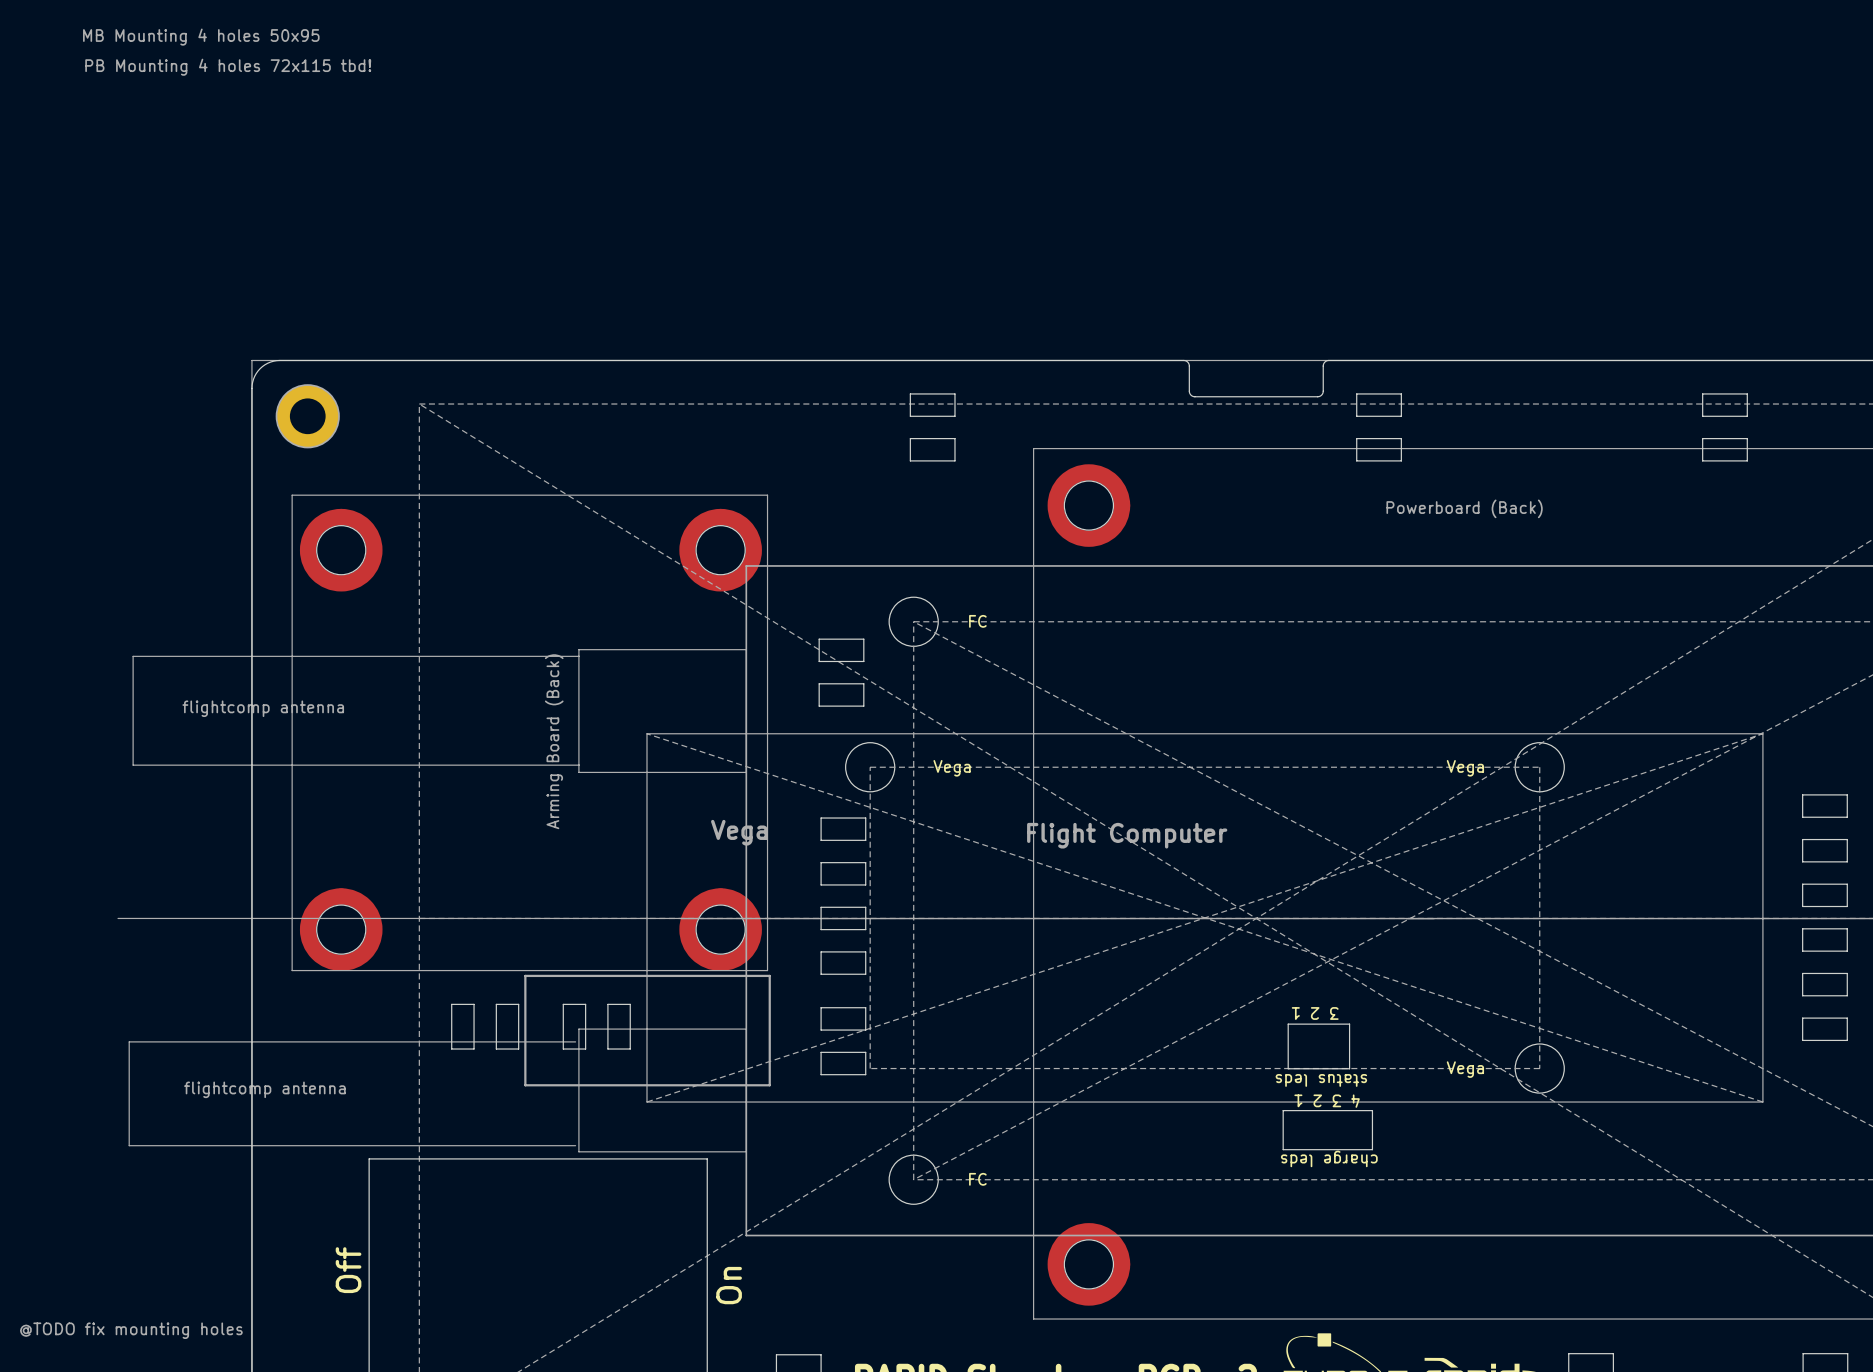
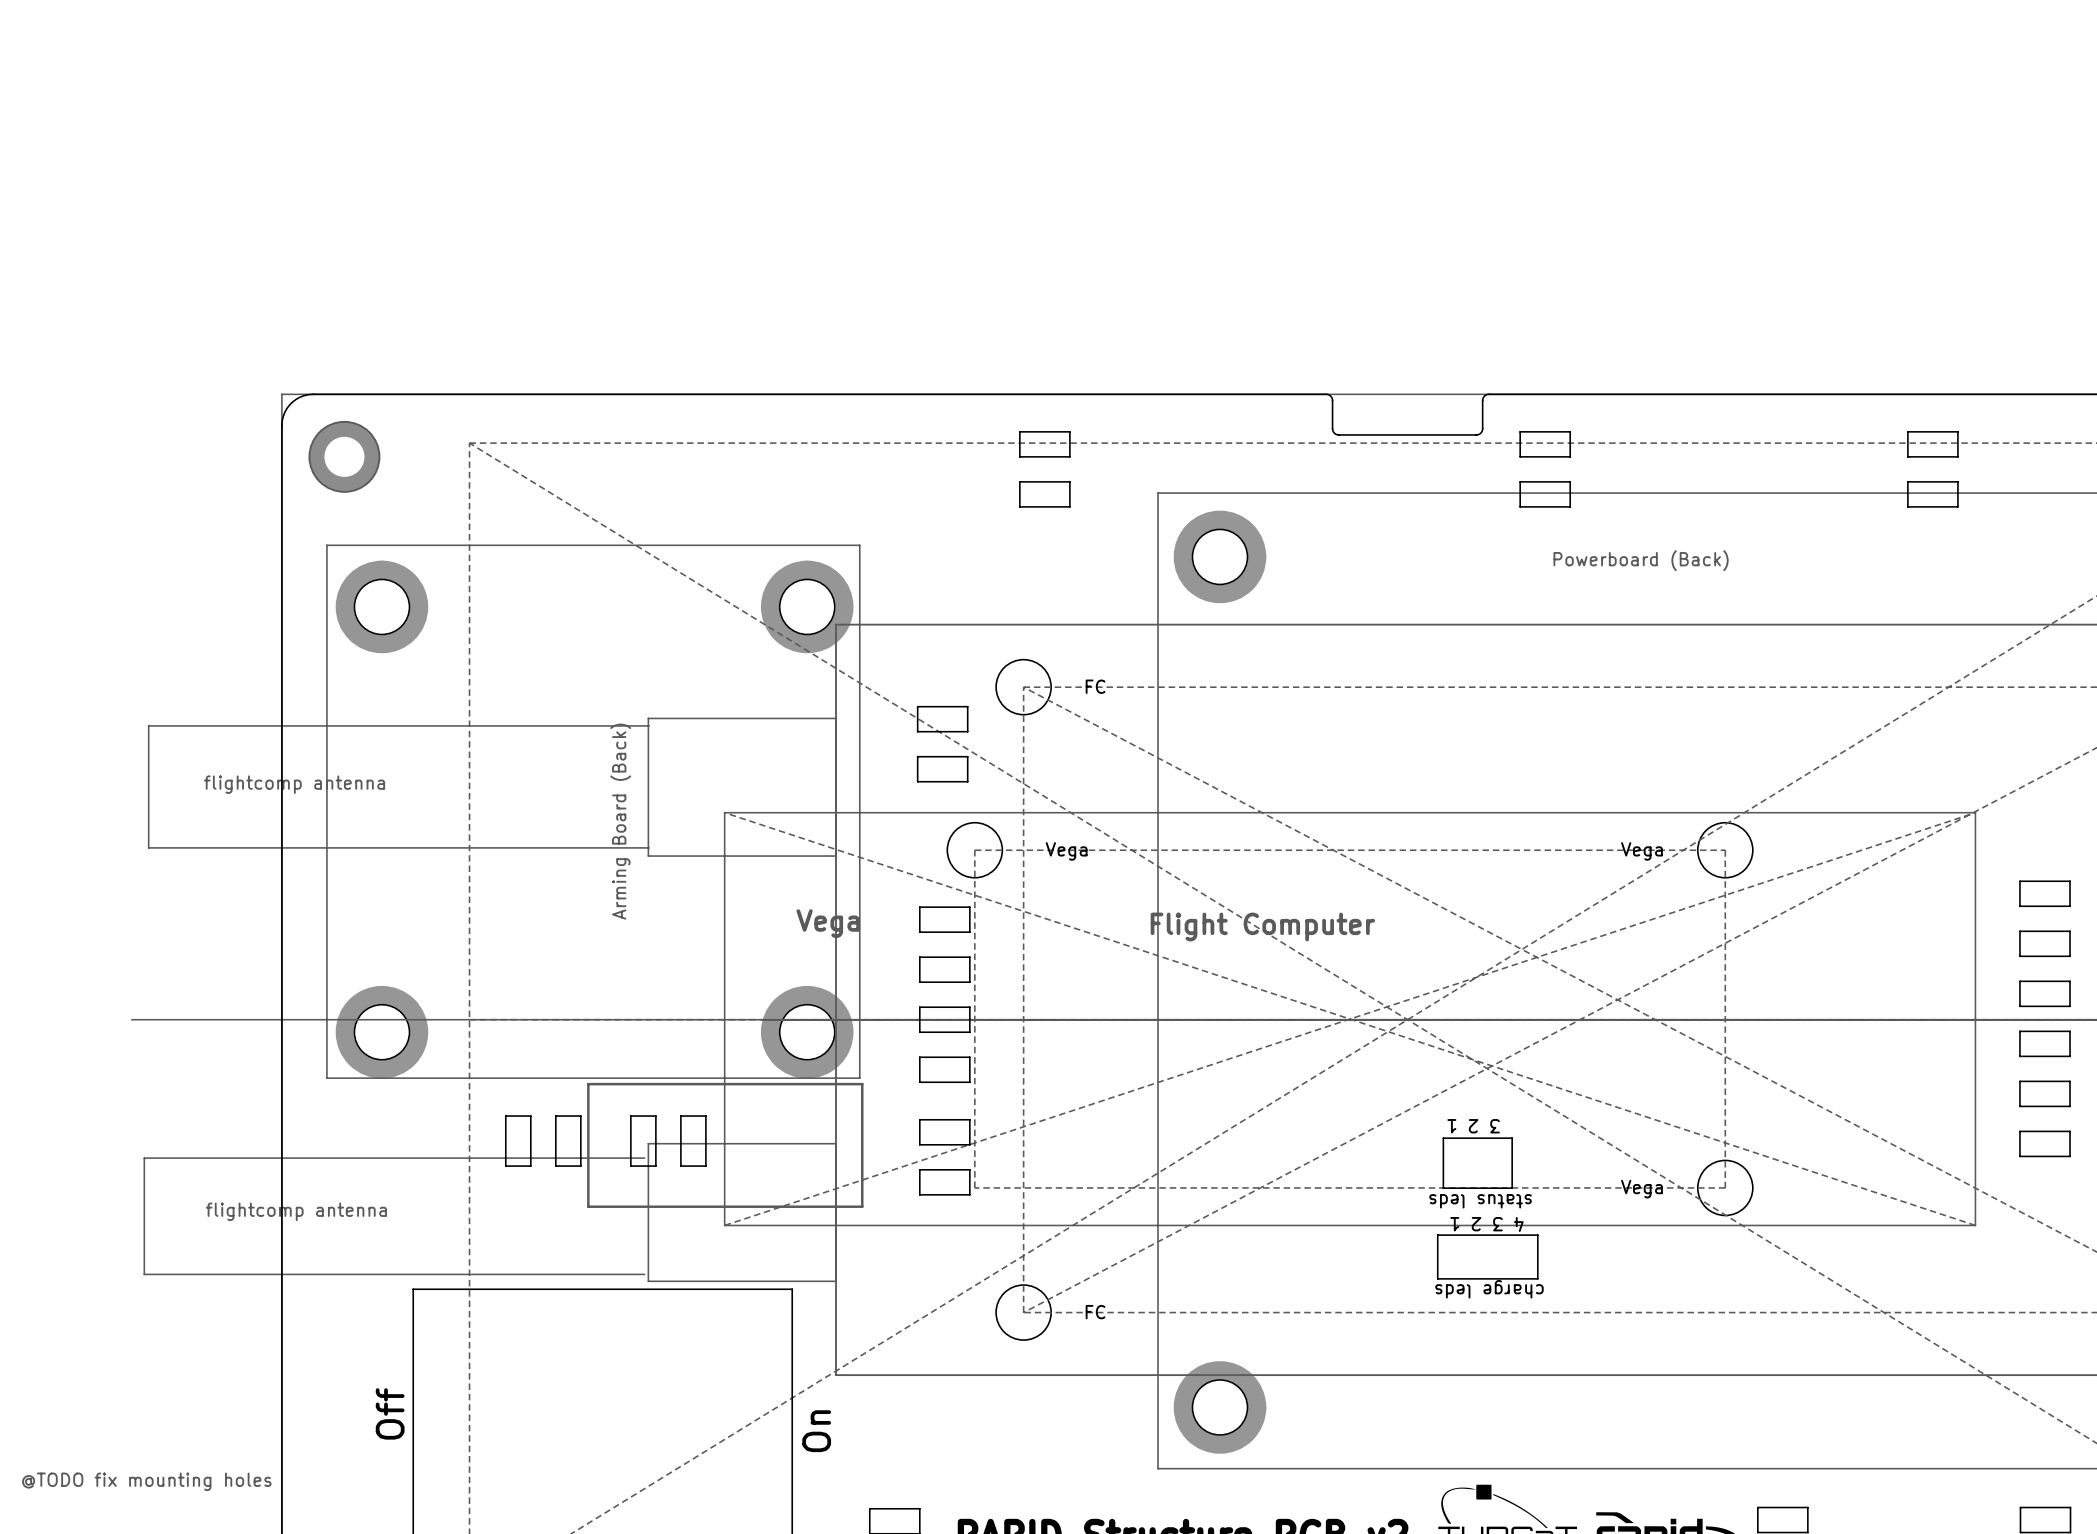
text: MB Mounting 4 holes 50x95 (201, 37) -> none
text: PB Mounting 4 holes 72x115 tbd! (228, 67) -> none

